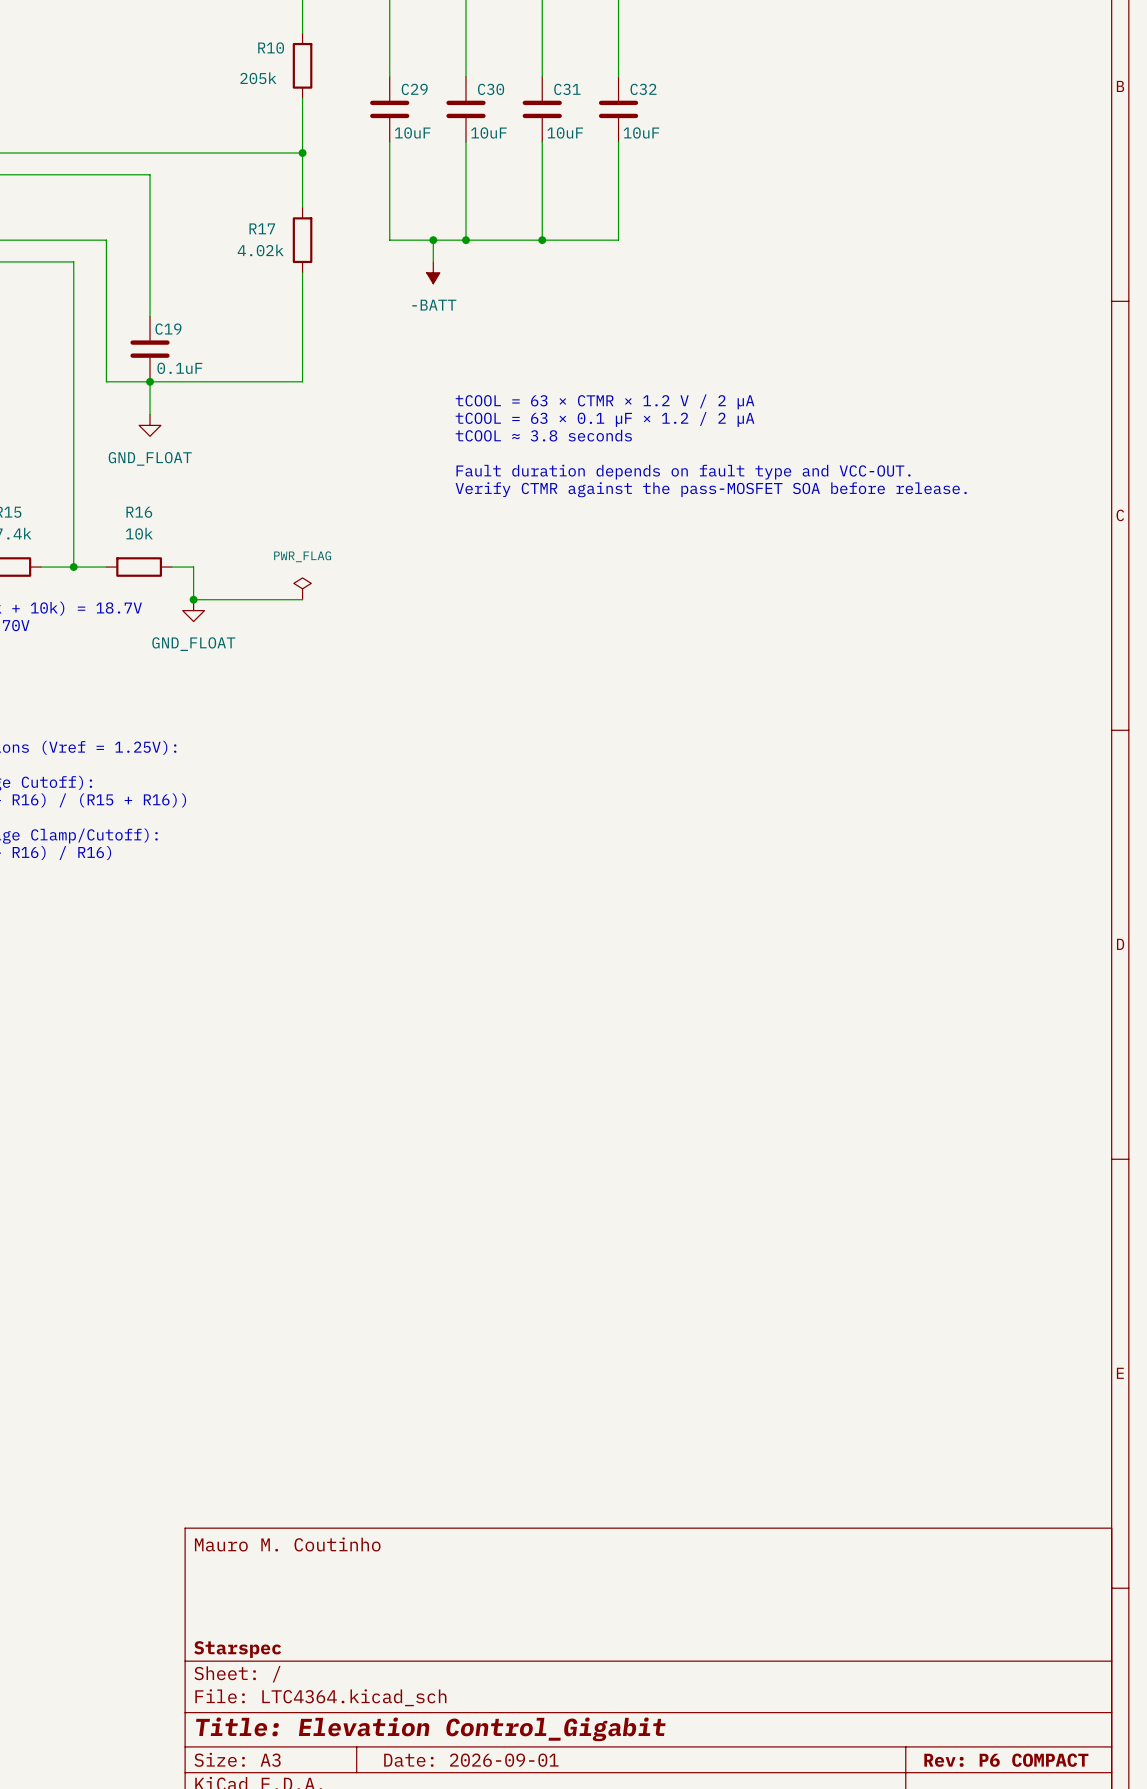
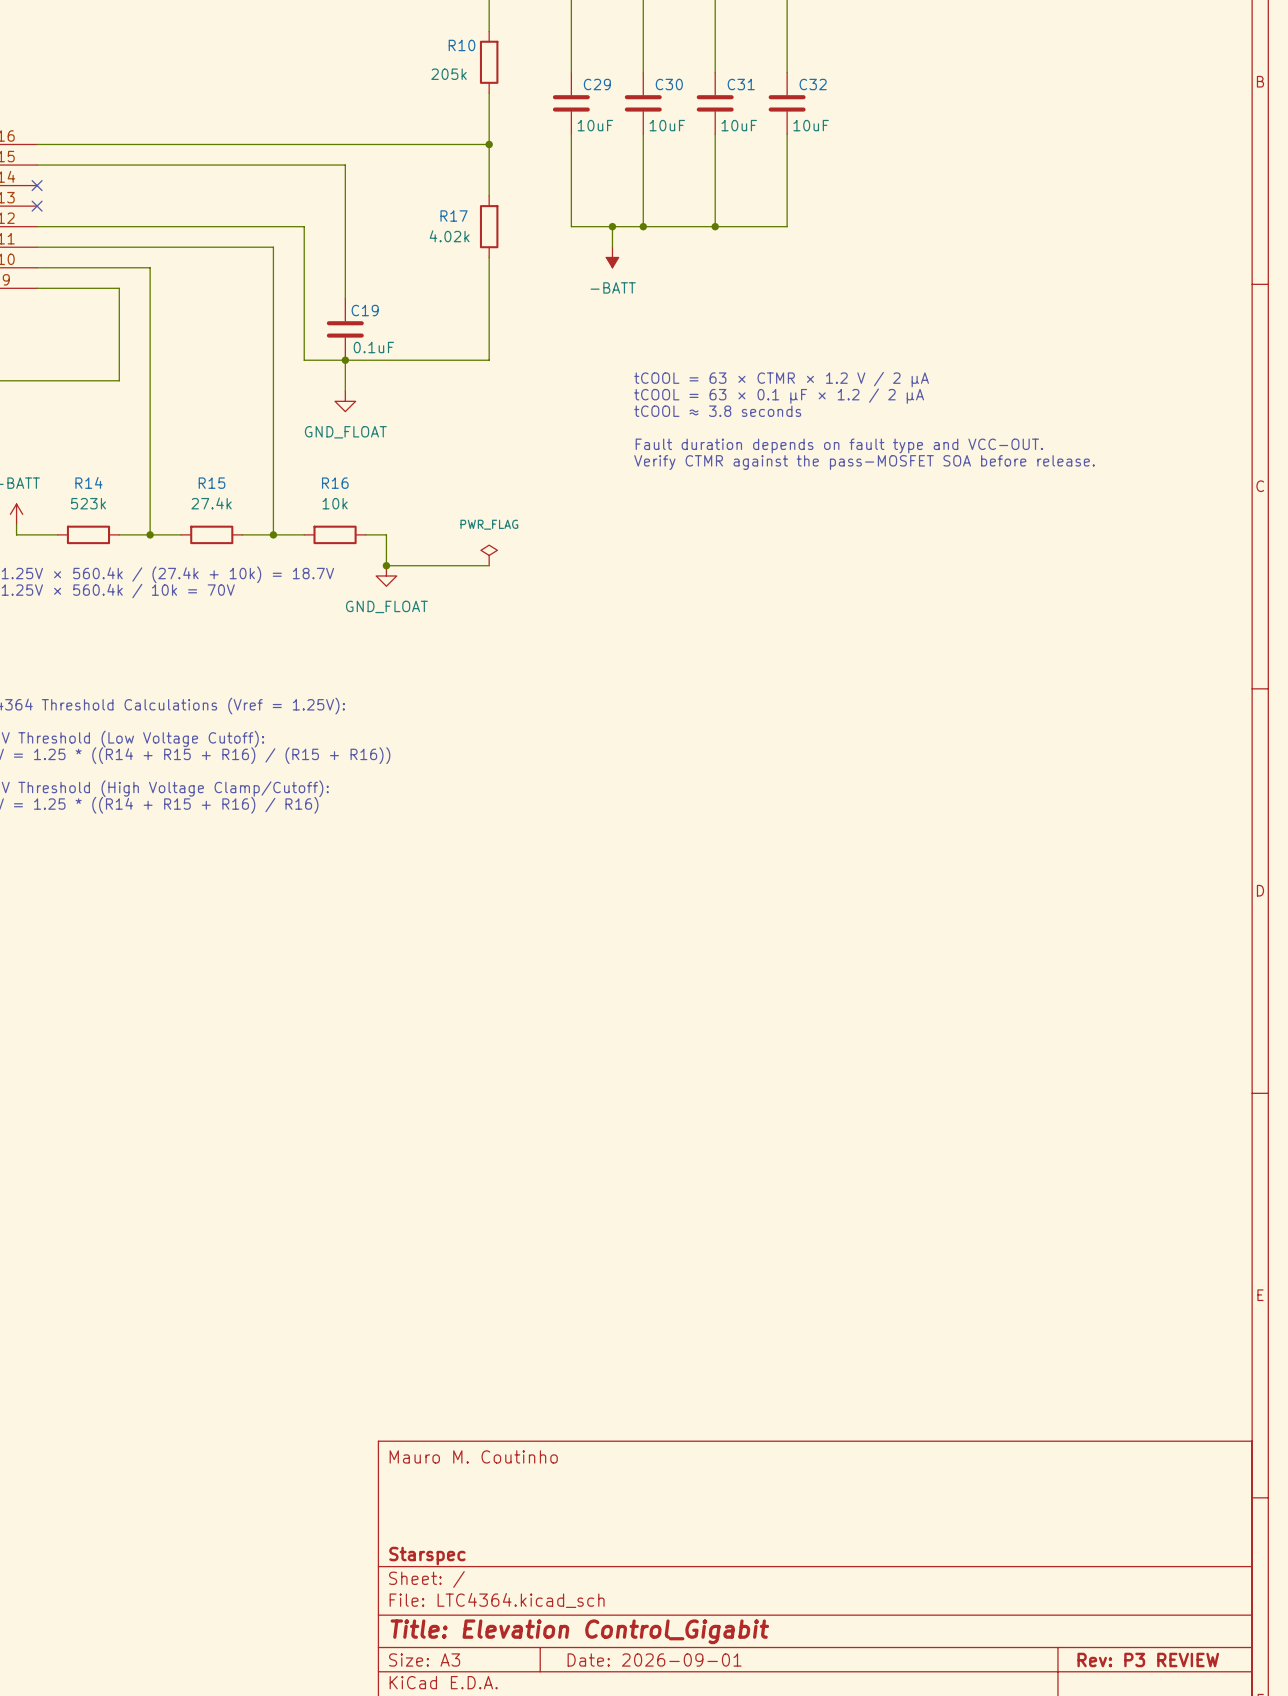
title block: Rev: P6 COMPACT (1006, 1760) -> Rev: P3 REVIEW (1148, 1660)

